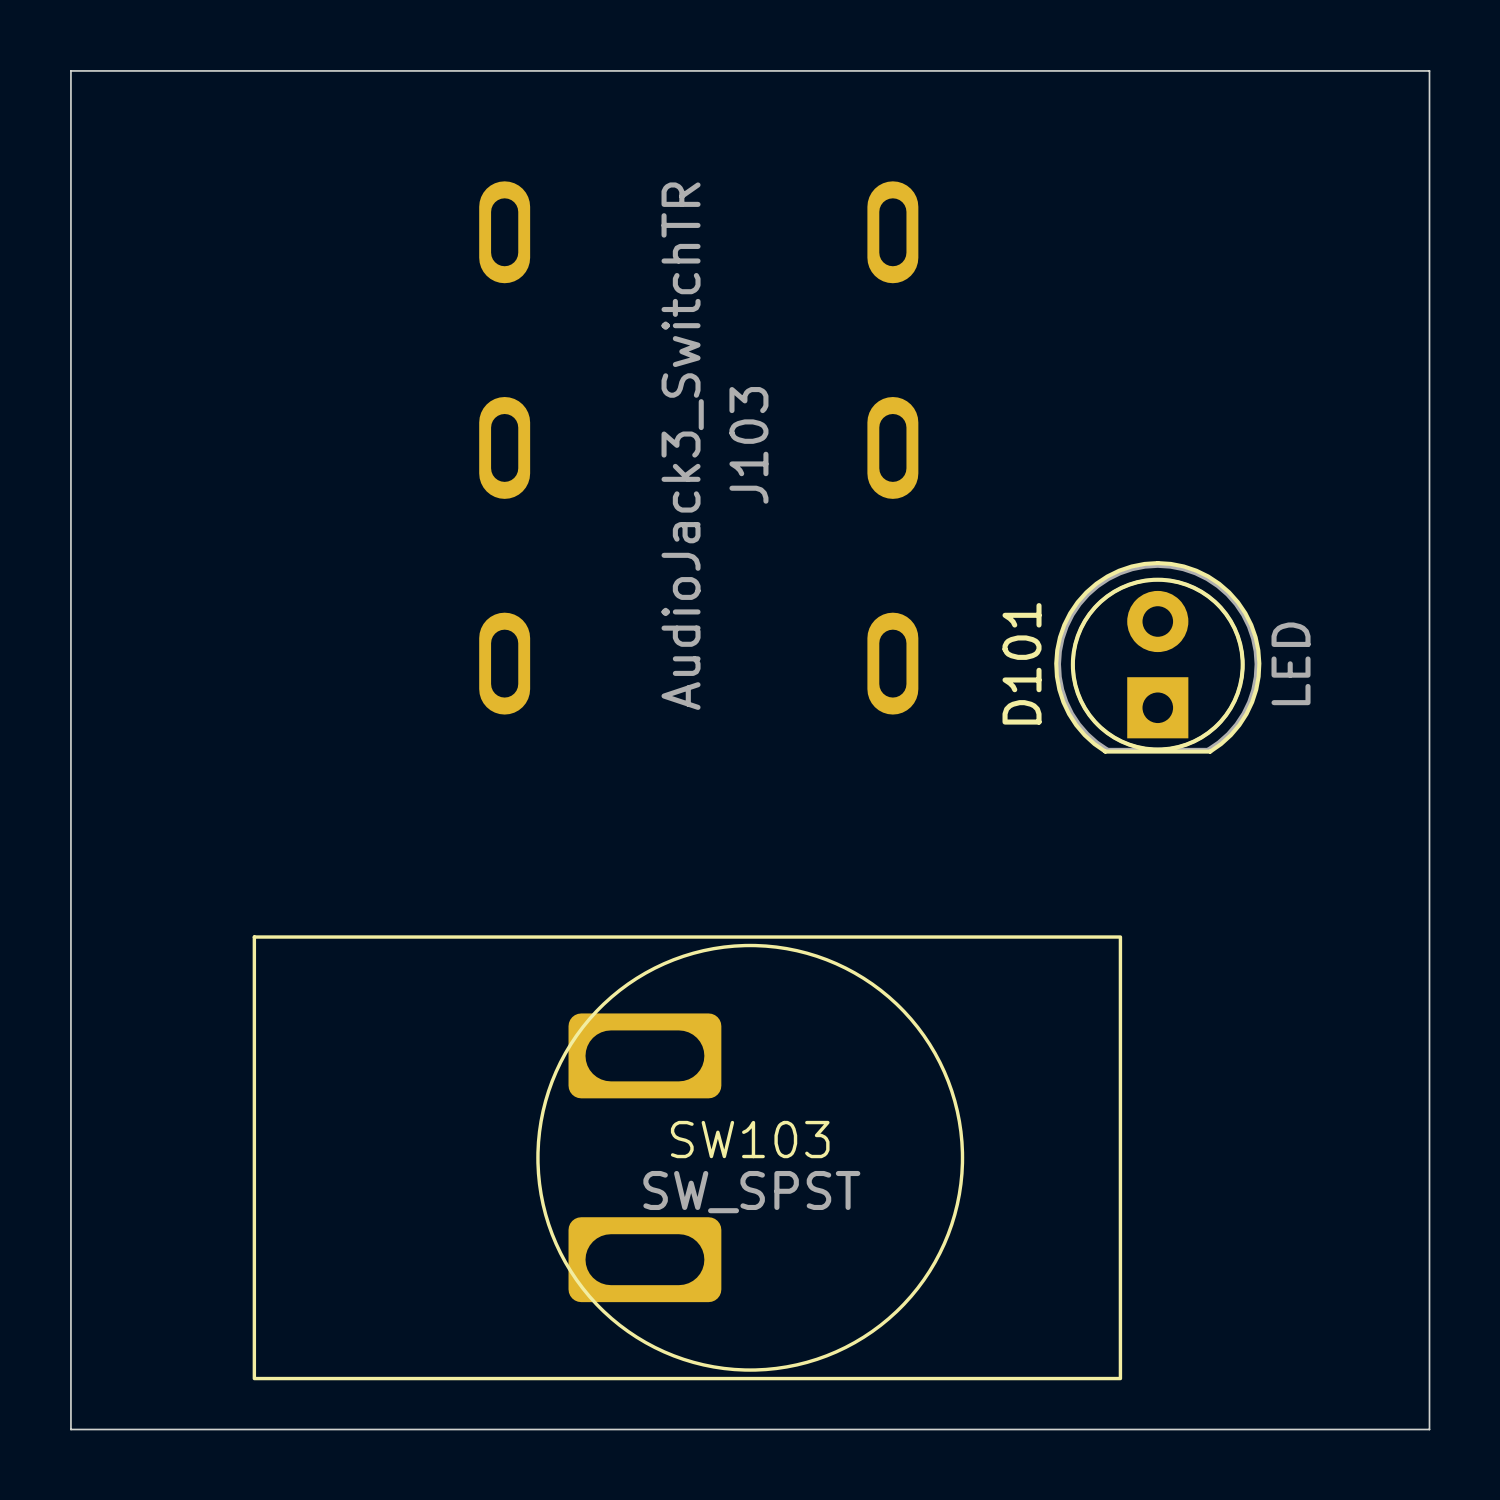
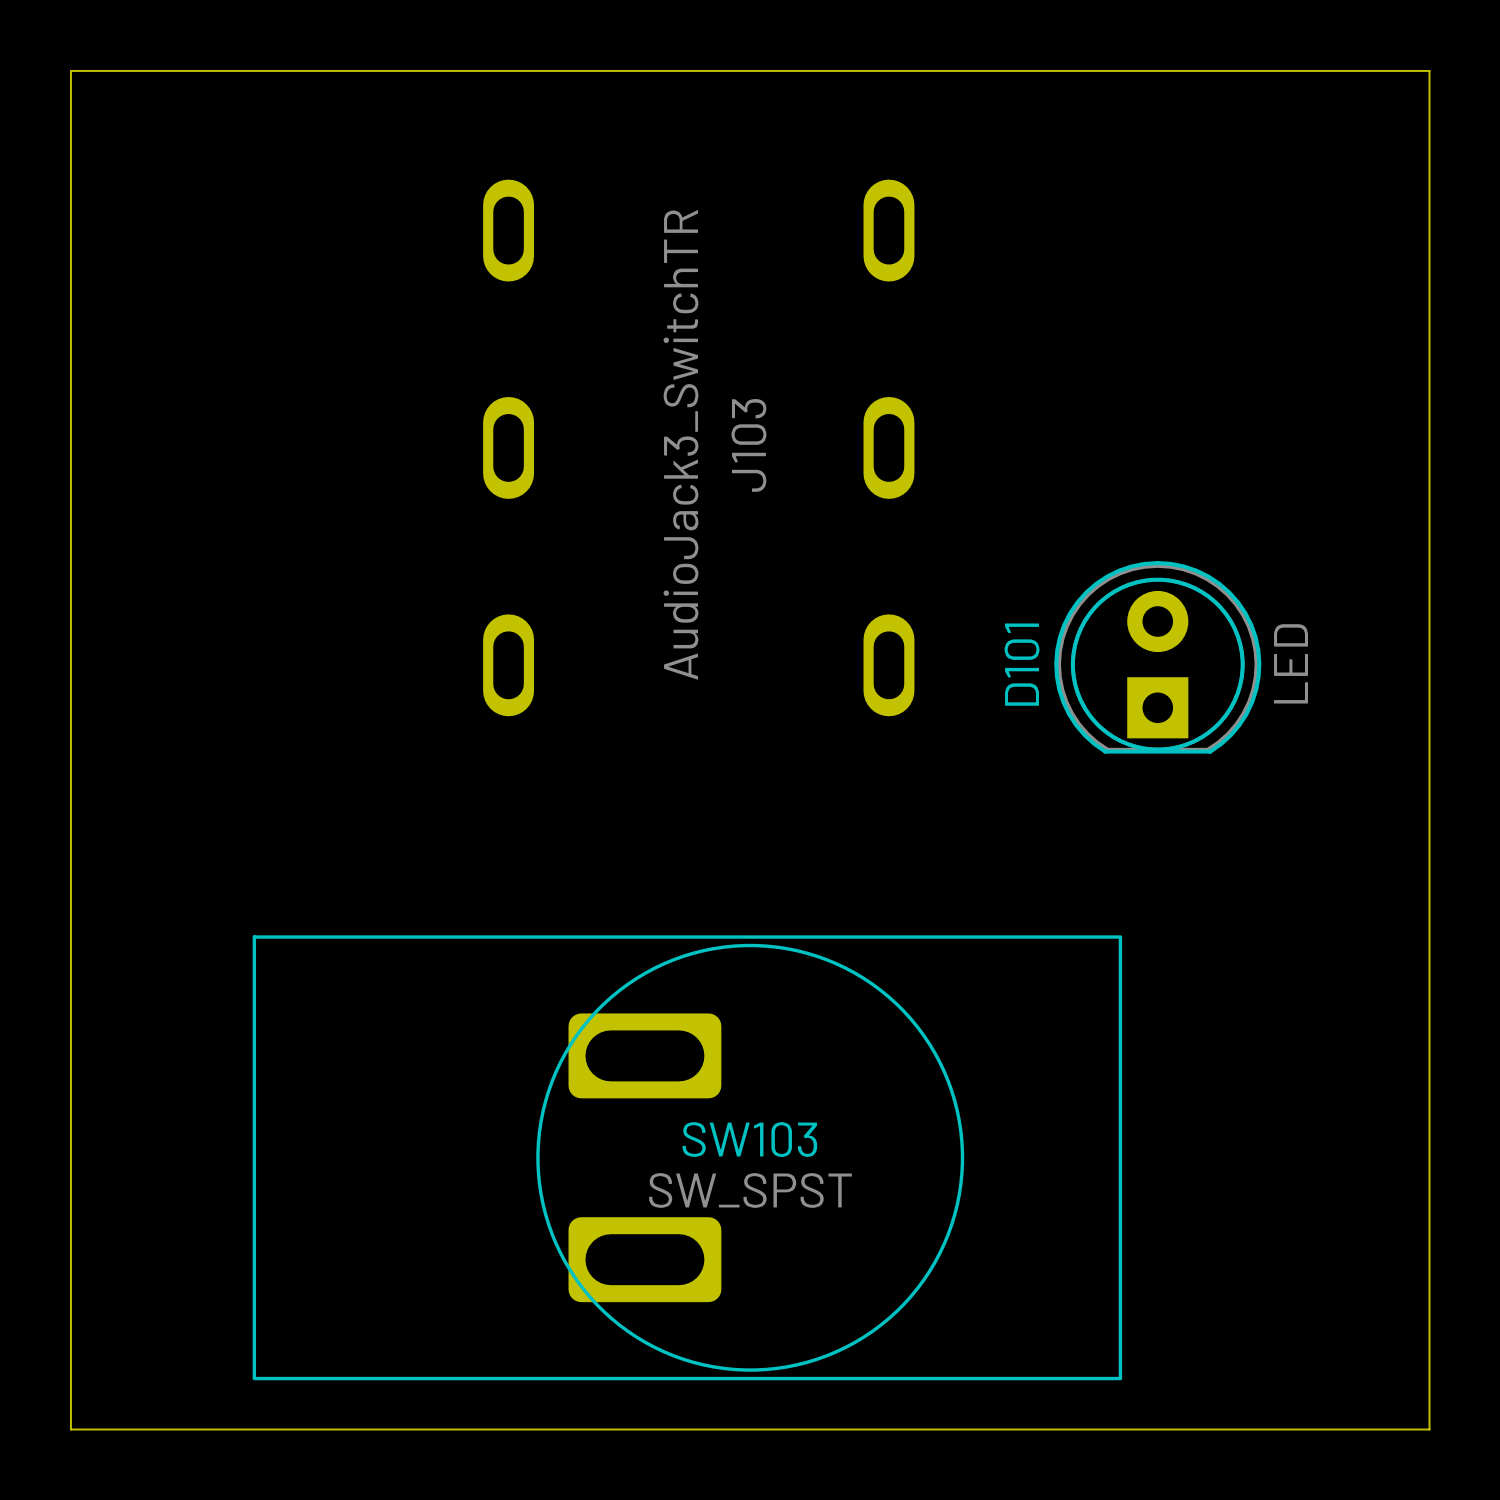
J103 footprint: [479, 181, 919, 715] -> [483, 179, 915, 717]

